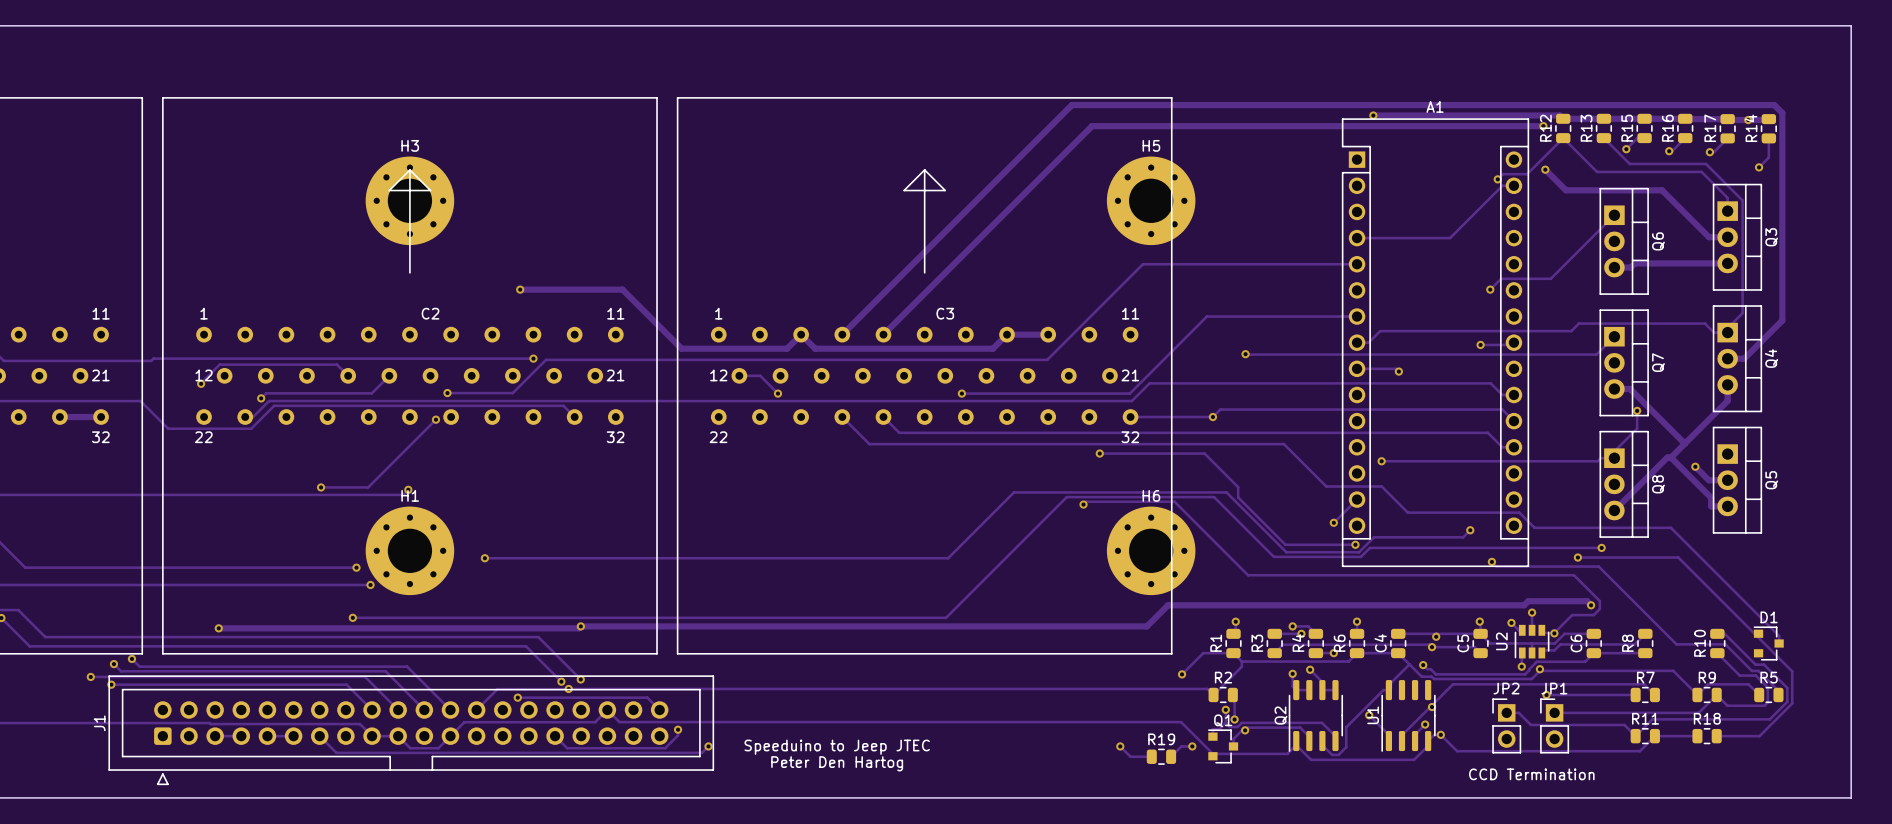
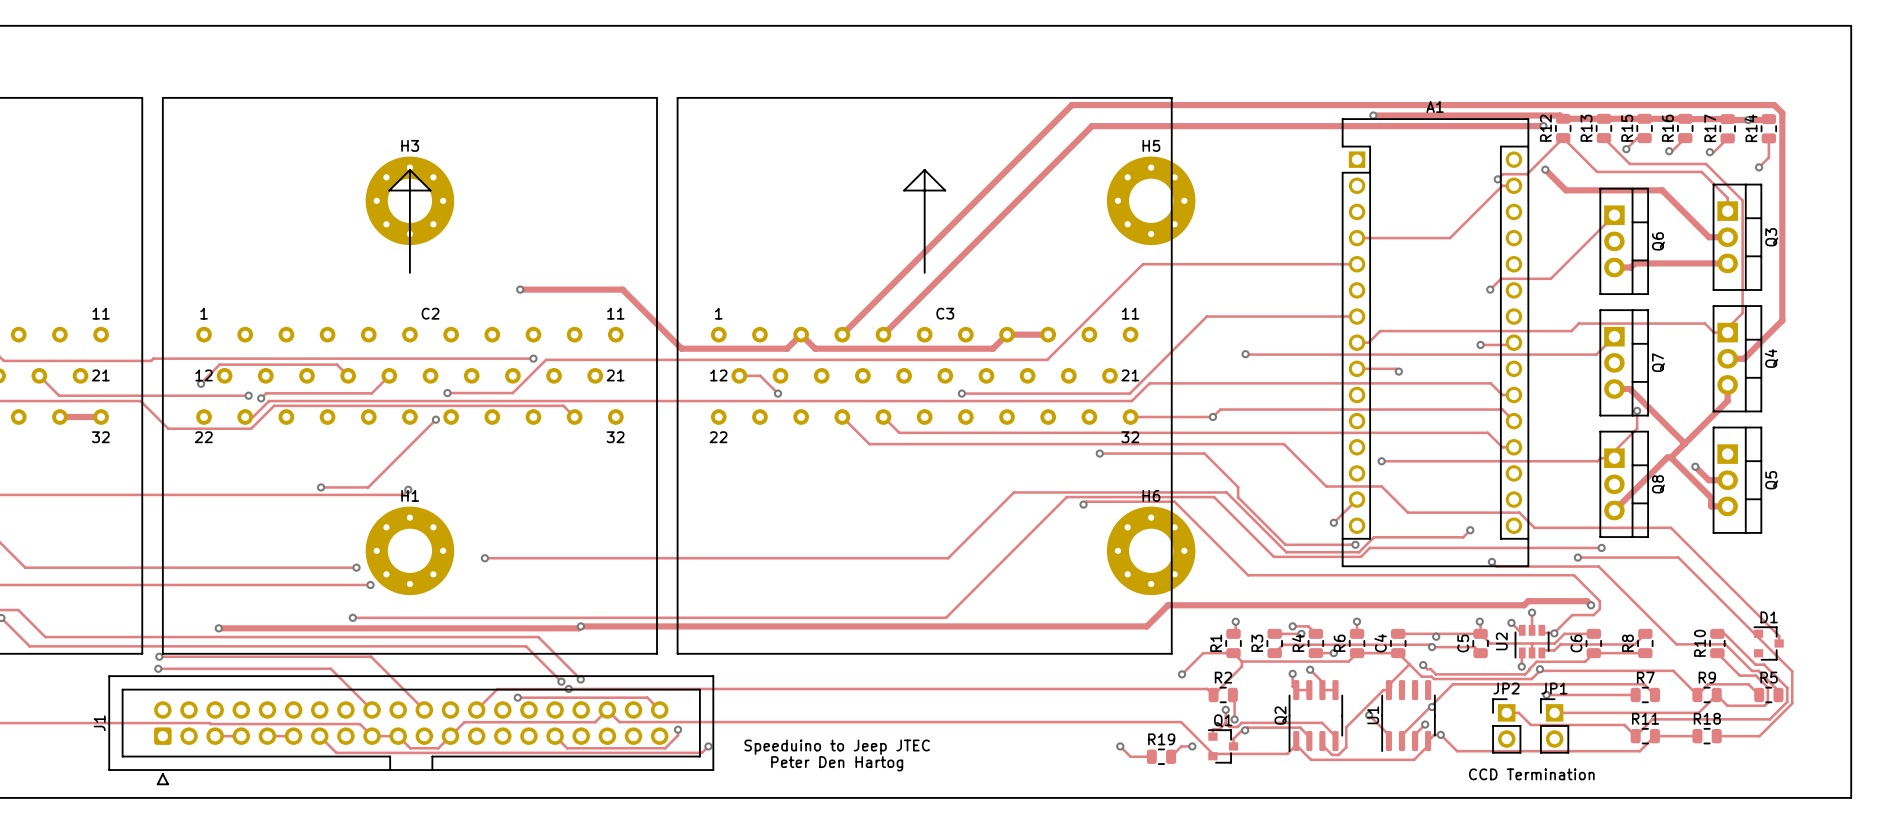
track: none -> (39, 375) (59, 395) (248, 395)
via: none -> (248, 395)
via: none -> (159, 656)
track: (131, 658) (139, 666) (407, 666) (450, 710) -> none
via: (131, 658) -> none
track: (113, 664) (121, 671) (385, 671) -> (159, 656) (371, 656) (385, 671)
via: (113, 664) -> none
via: none -> (158, 668)
track: (90, 676) (365, 676) (398, 710) -> none
via: (90, 676) -> none
track: (111, 684) (346, 684) -> (158, 668) (330, 668) (346, 684)
via: (111, 684) -> none

